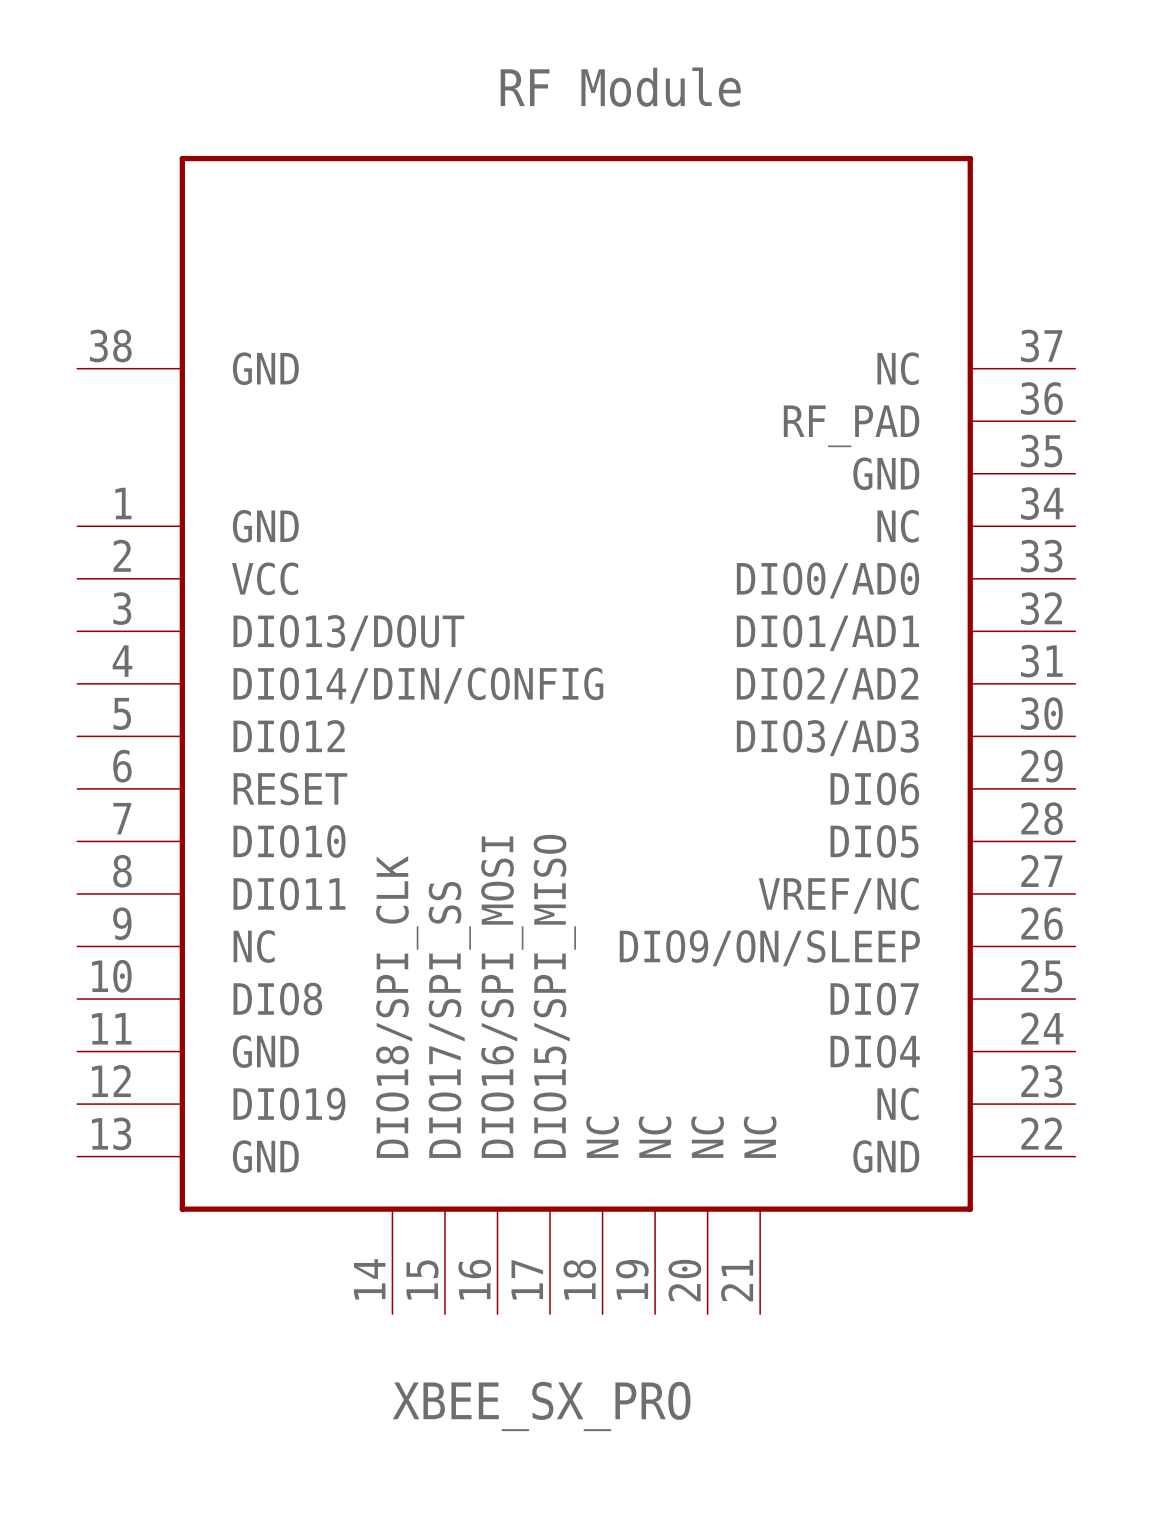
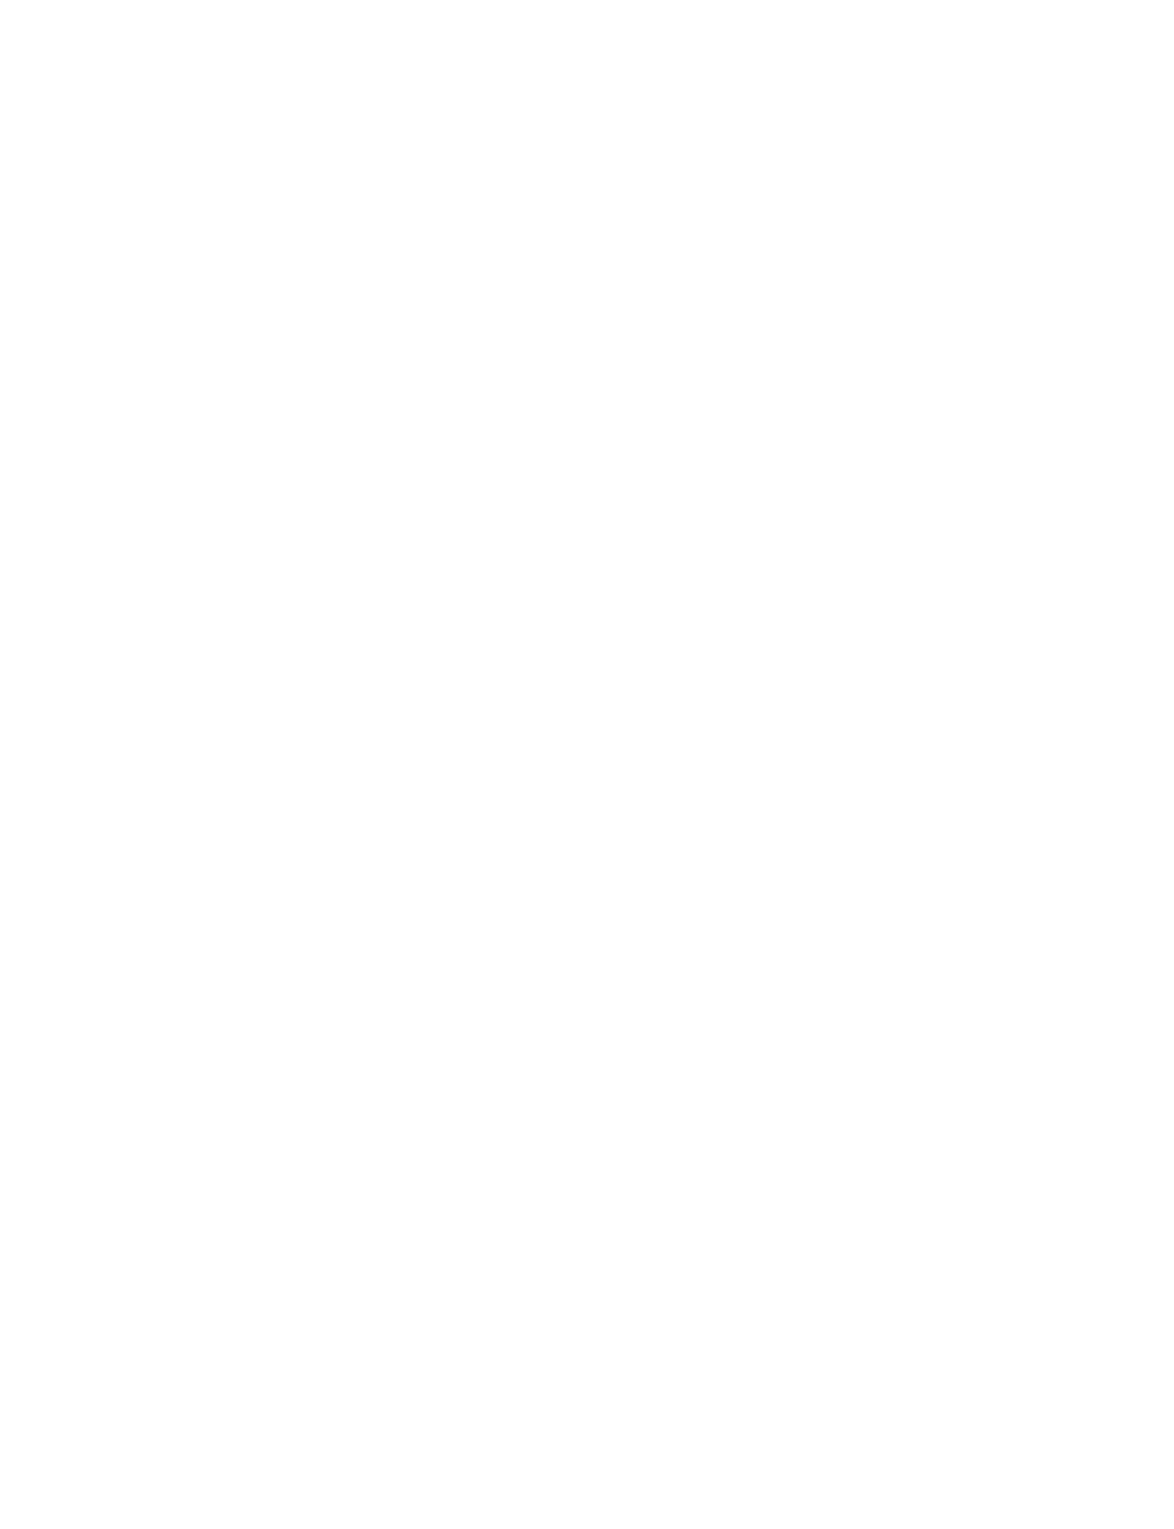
part: (576, 735) -> none

